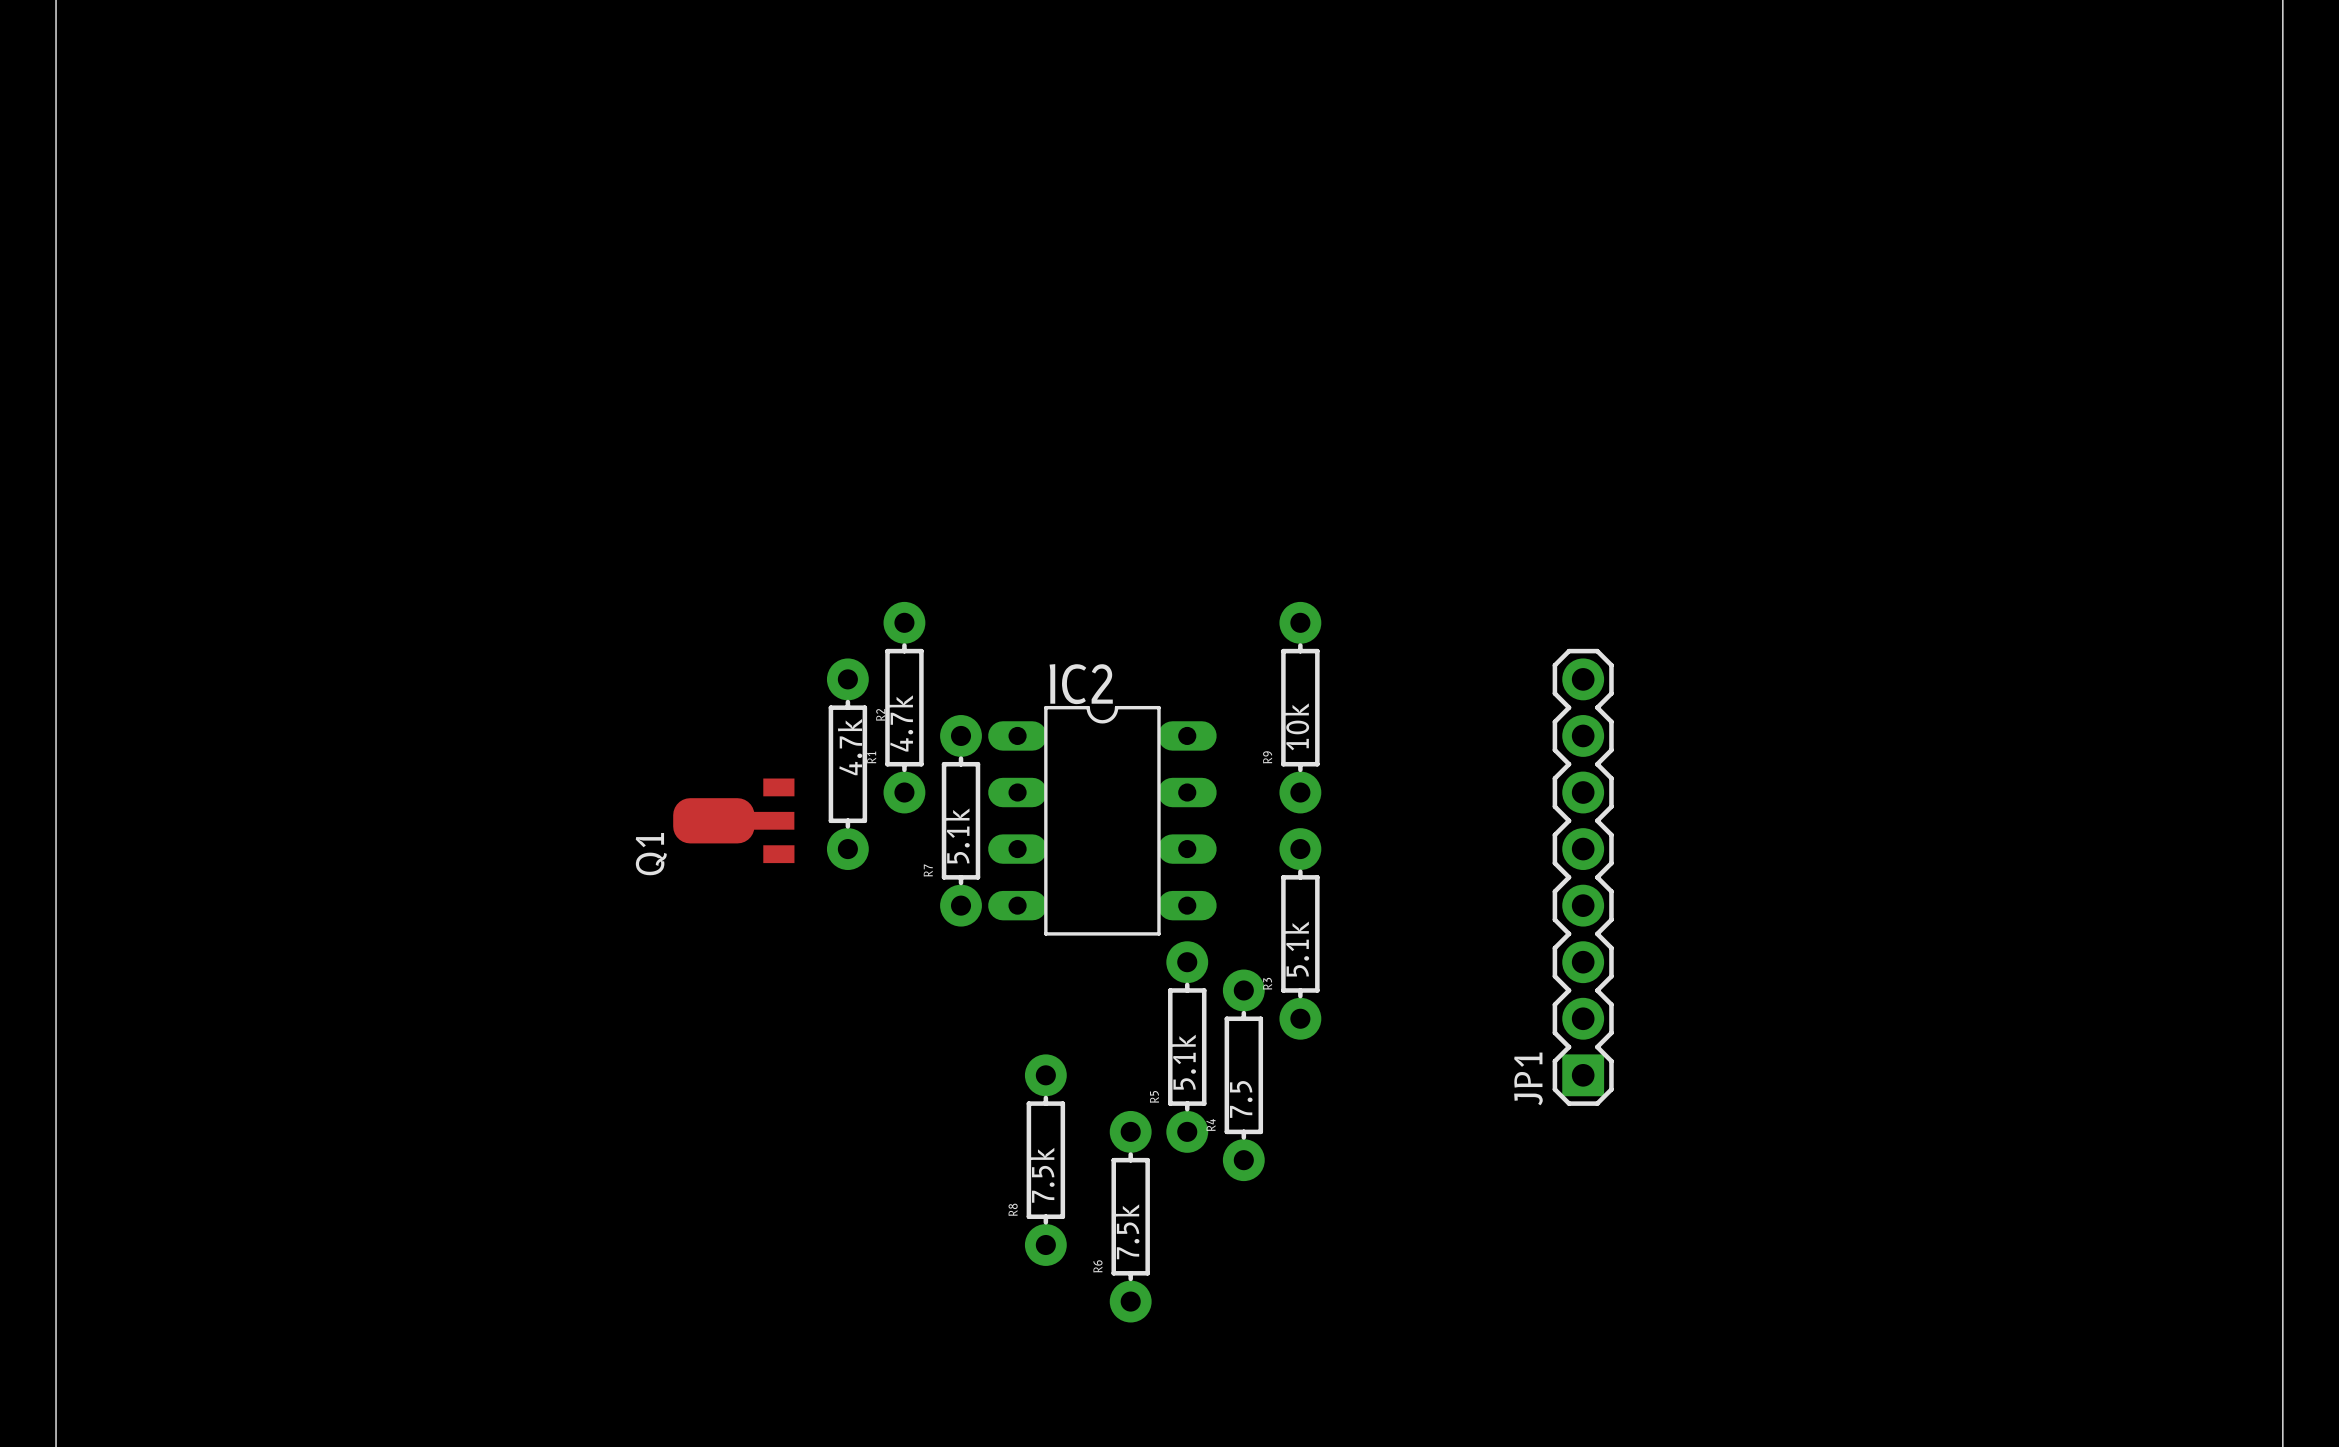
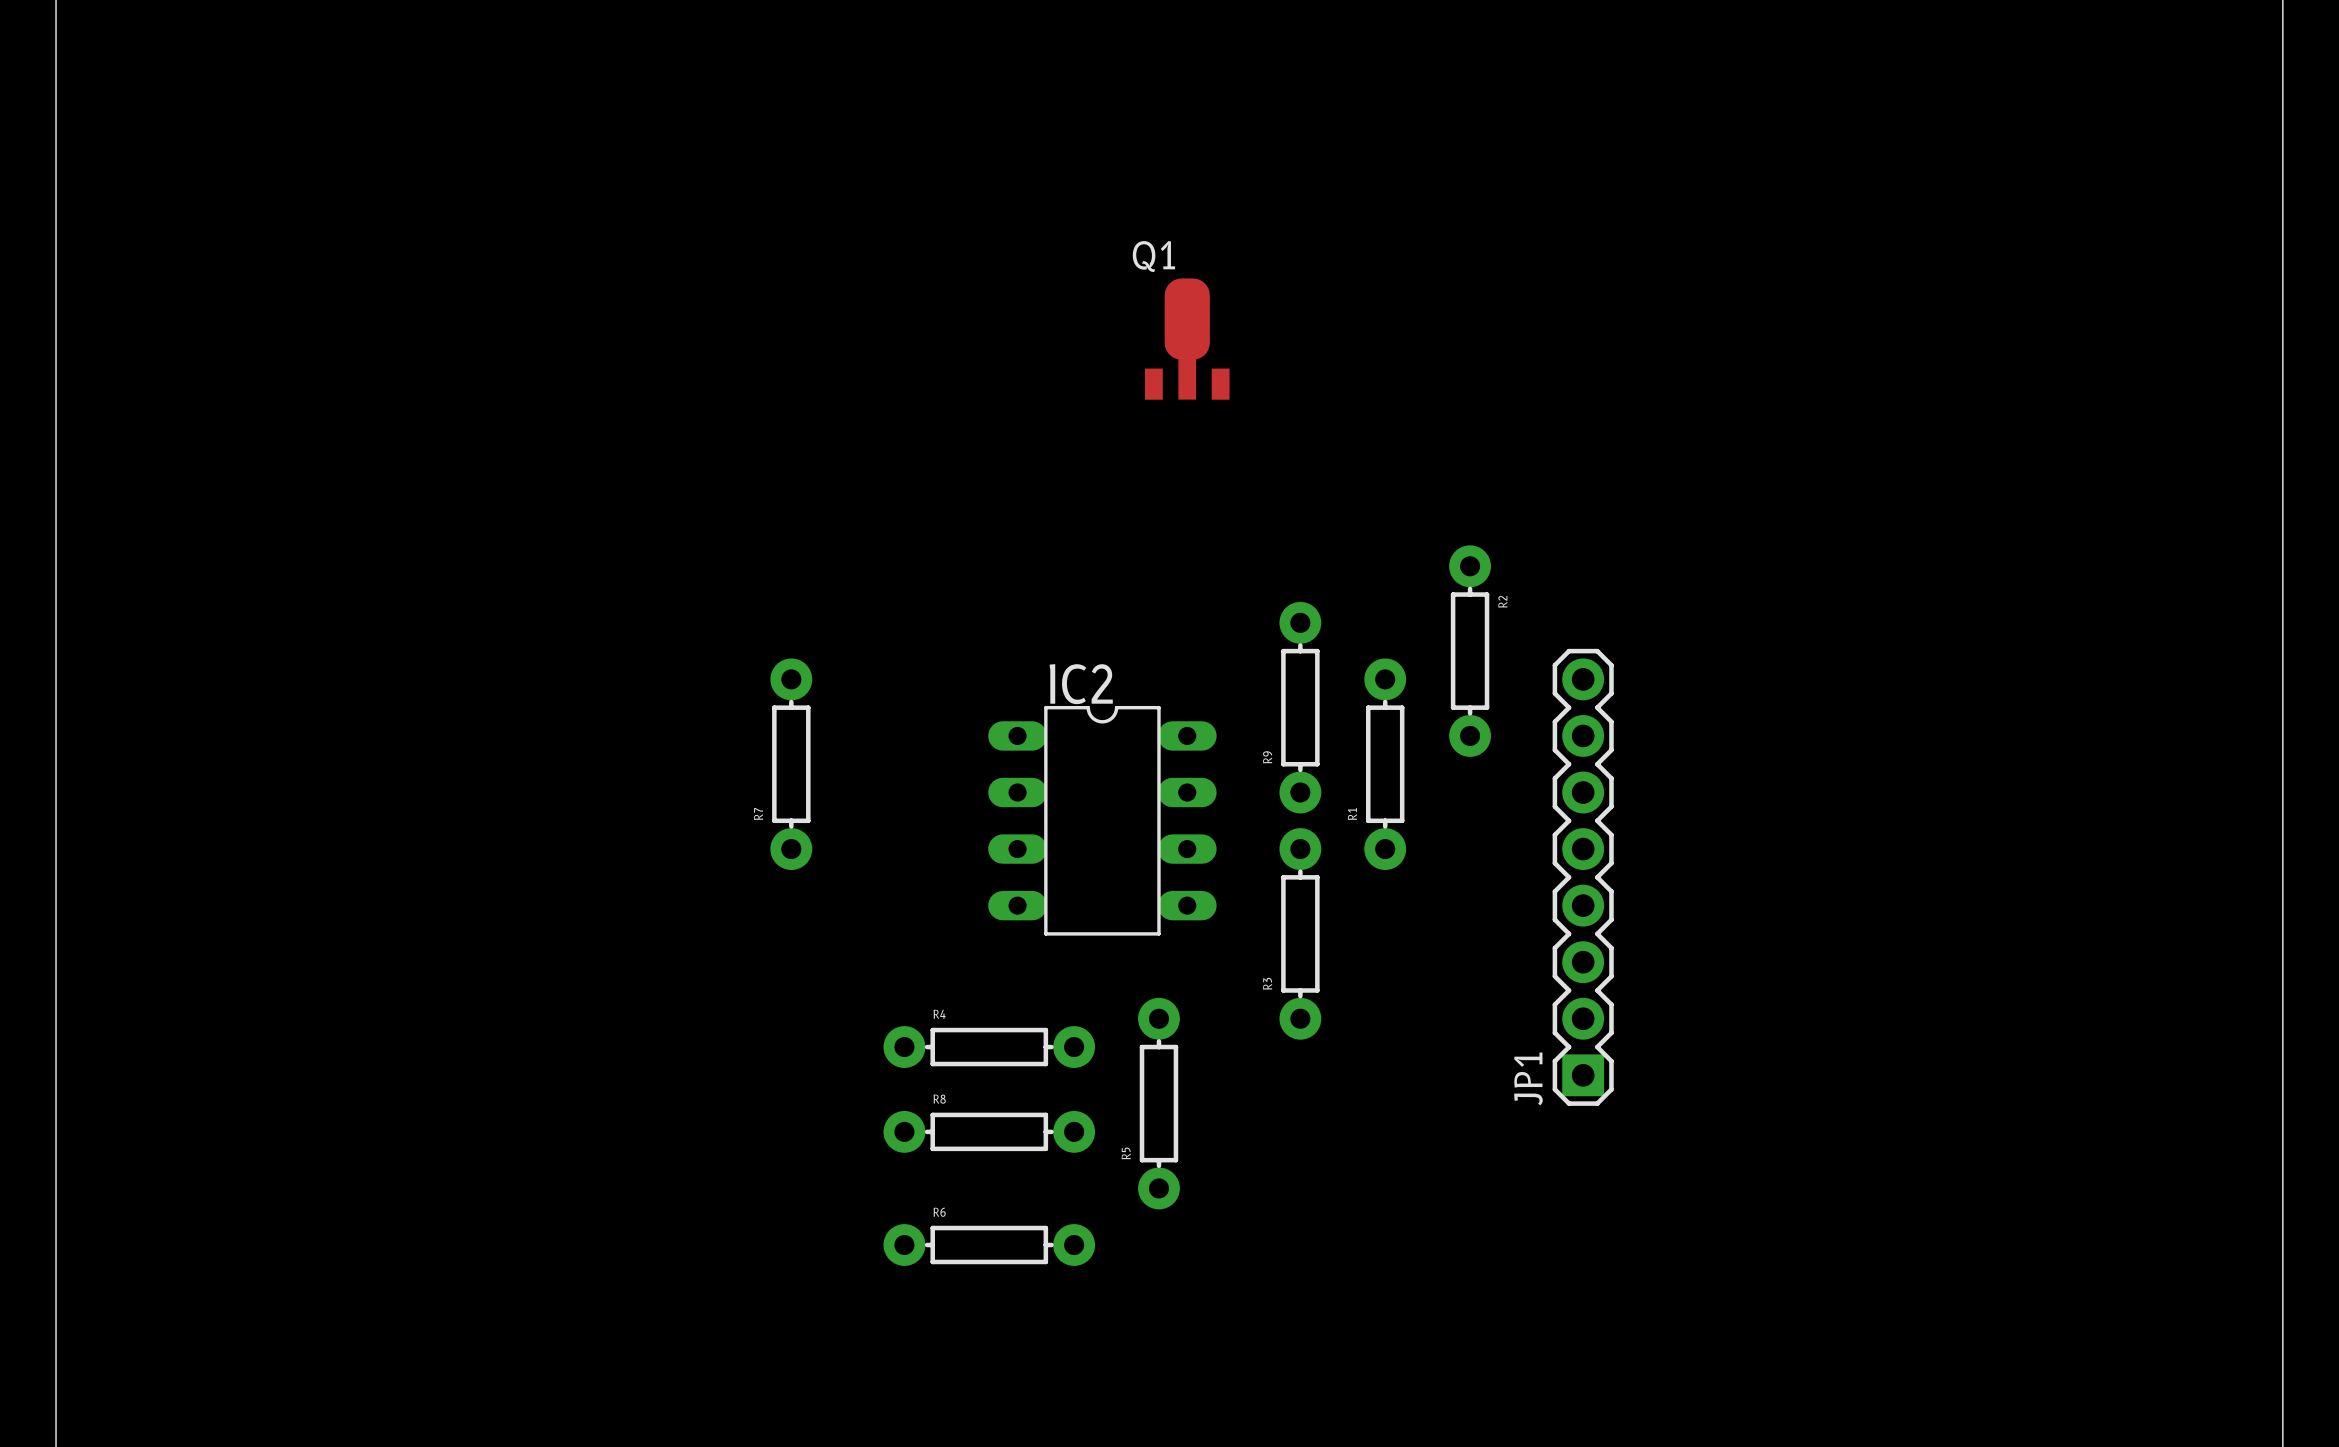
R1 position: (904, 707) -> (1385, 764)
R1 value: 4.7k (901, 723) -> none
R9 value: 10k (1296, 726) -> none
R2 value: 4.7k (850, 747) -> none
R2 position: (847, 764) -> (1470, 651)
Q1 rotation: 0° (733, 820) -> 90° clockwise (1187, 339)
Q1 position: (733, 820) -> (1187, 339)
R7 position: (961, 820) -> (791, 764)
R7 value: 5.1k (957, 835) -> none
R3 value: 5.1k (1296, 949) -> none
R5 position: (1187, 1047) -> (1158, 1103)
R5 value: 5.1k (1183, 1062) -> none
R4 rotation: 0° (1243, 1075) -> 90° clockwise (989, 1047)
R4 position: (1243, 1075) -> (989, 1047)
R4 value: 7.5 (1241, 1099) -> none
R8 rotation: 0° (1045, 1160) -> 90° clockwise (989, 1131)
R8 value: 7.5k (1042, 1175) -> none
R6 rotation: 0° (1130, 1216) -> 90° clockwise (989, 1245)
R6 position: (1130, 1216) -> (989, 1245)
R6 value: 7.5k (1127, 1231) -> none

